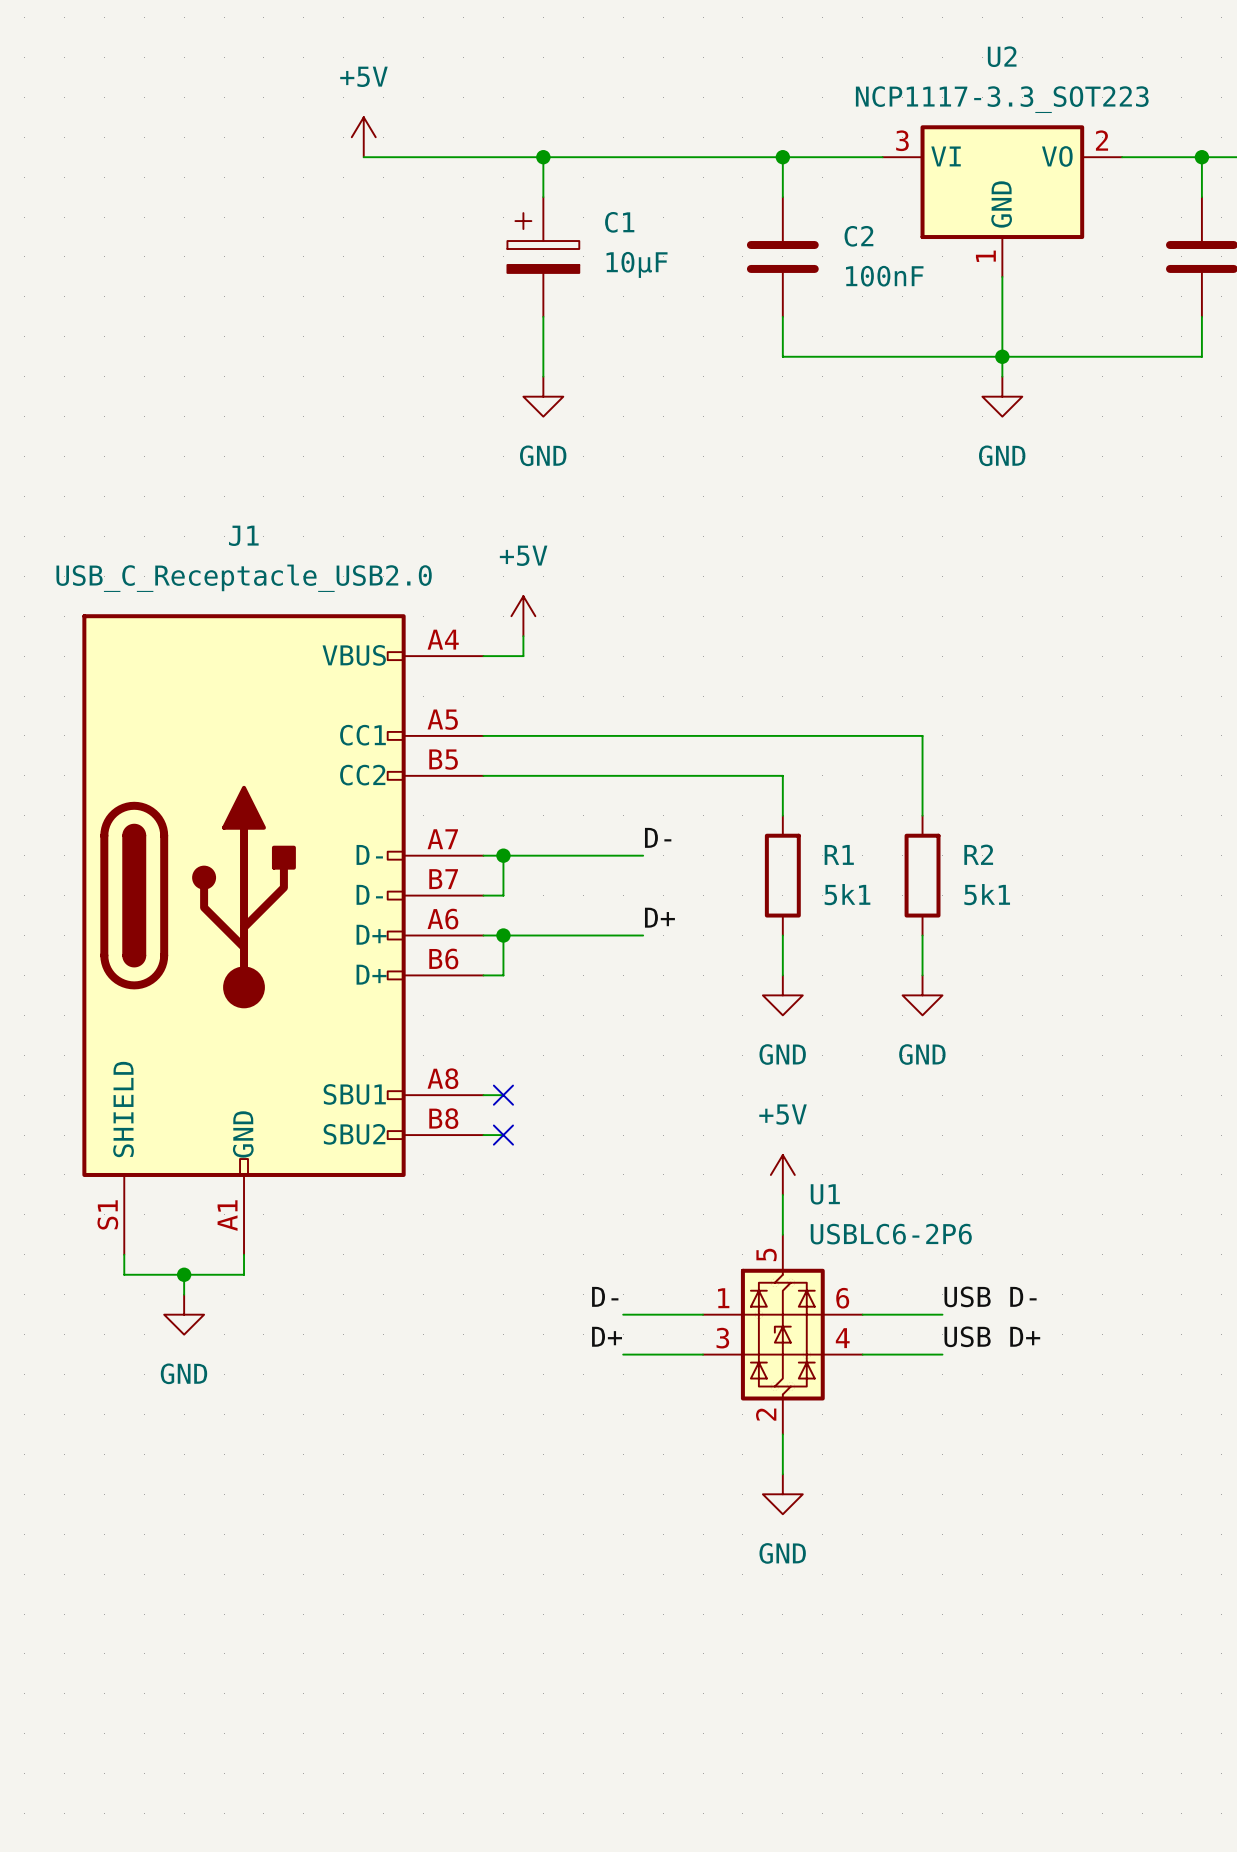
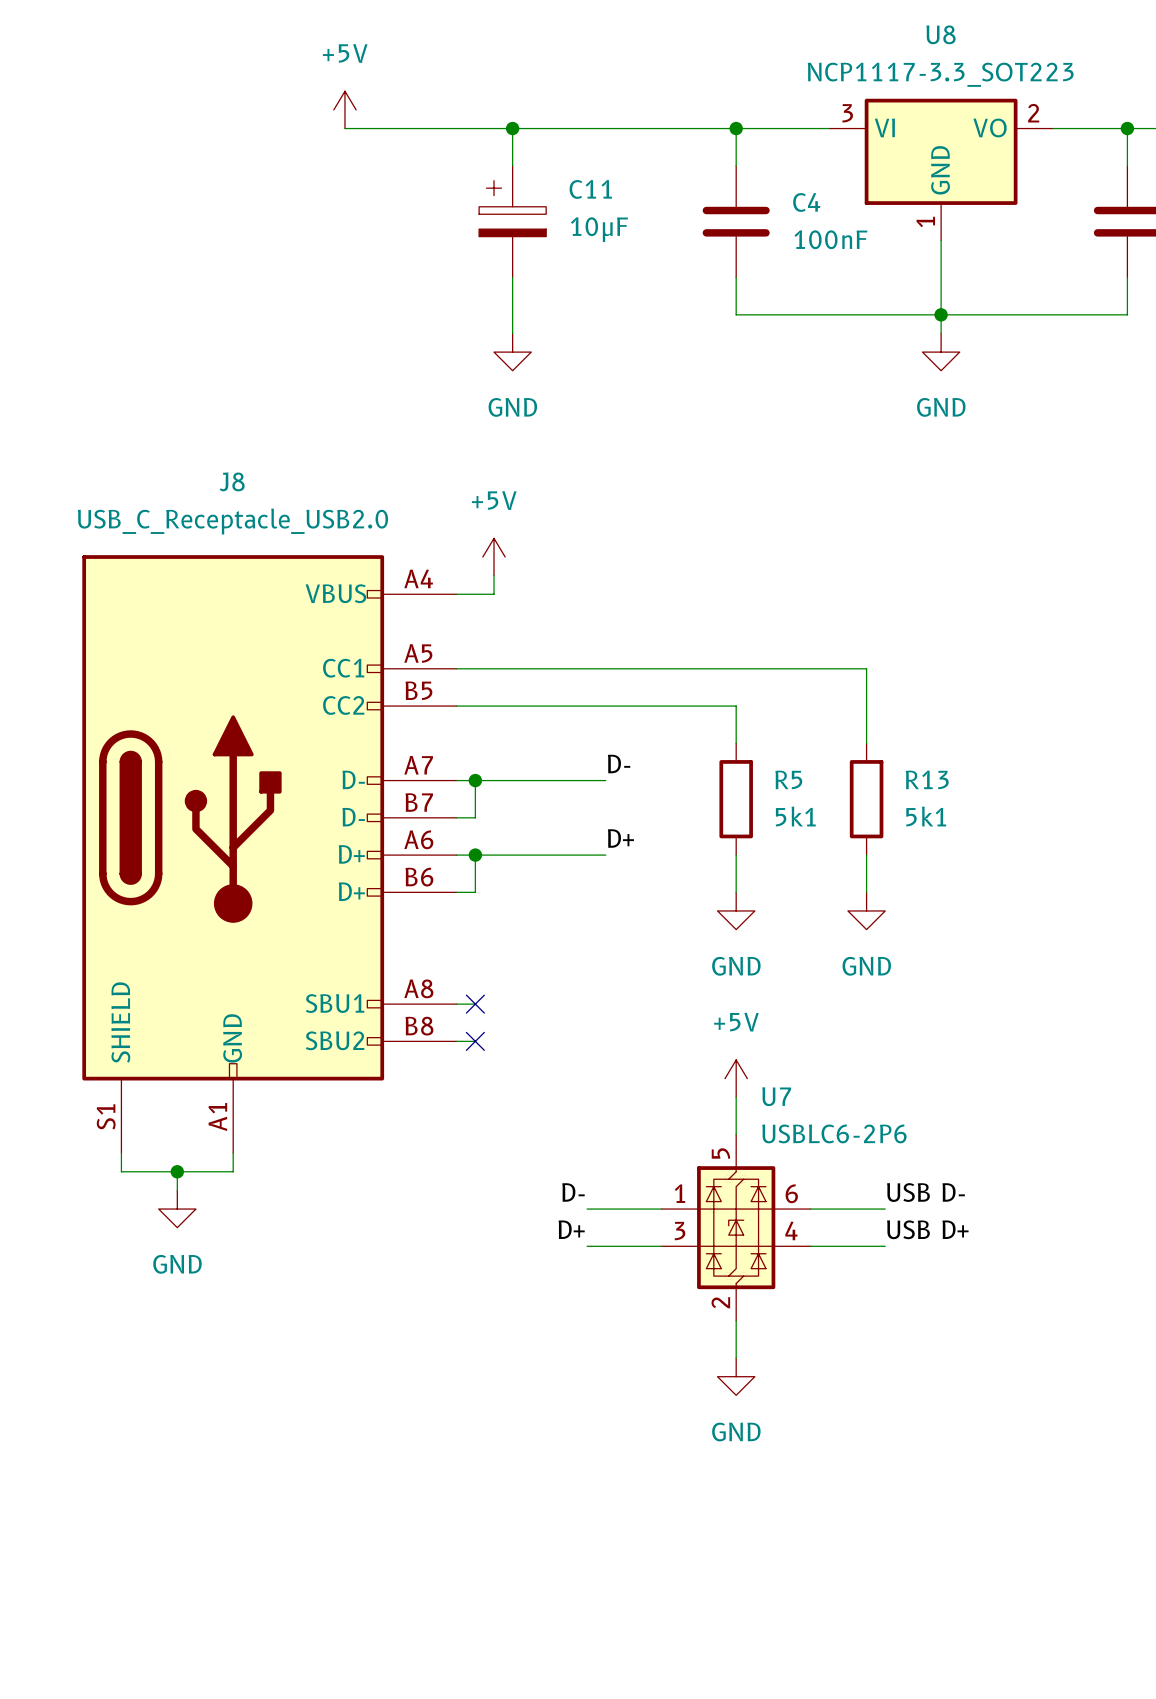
U2 name: U2 (1002, 56) -> U8 (940, 34)
C1 name: C1 (619, 222) -> C11 (590, 189)
C2 name: C2 (858, 236) -> C4 (806, 202)
J1 name: J1 (243, 535) -> J8 (232, 481)
R1 name: R1 (839, 854) -> R5 (788, 779)
R2 name: R2 (978, 854) -> R13 (927, 779)
U1 name: U1 (825, 1194) -> U7 (776, 1096)

